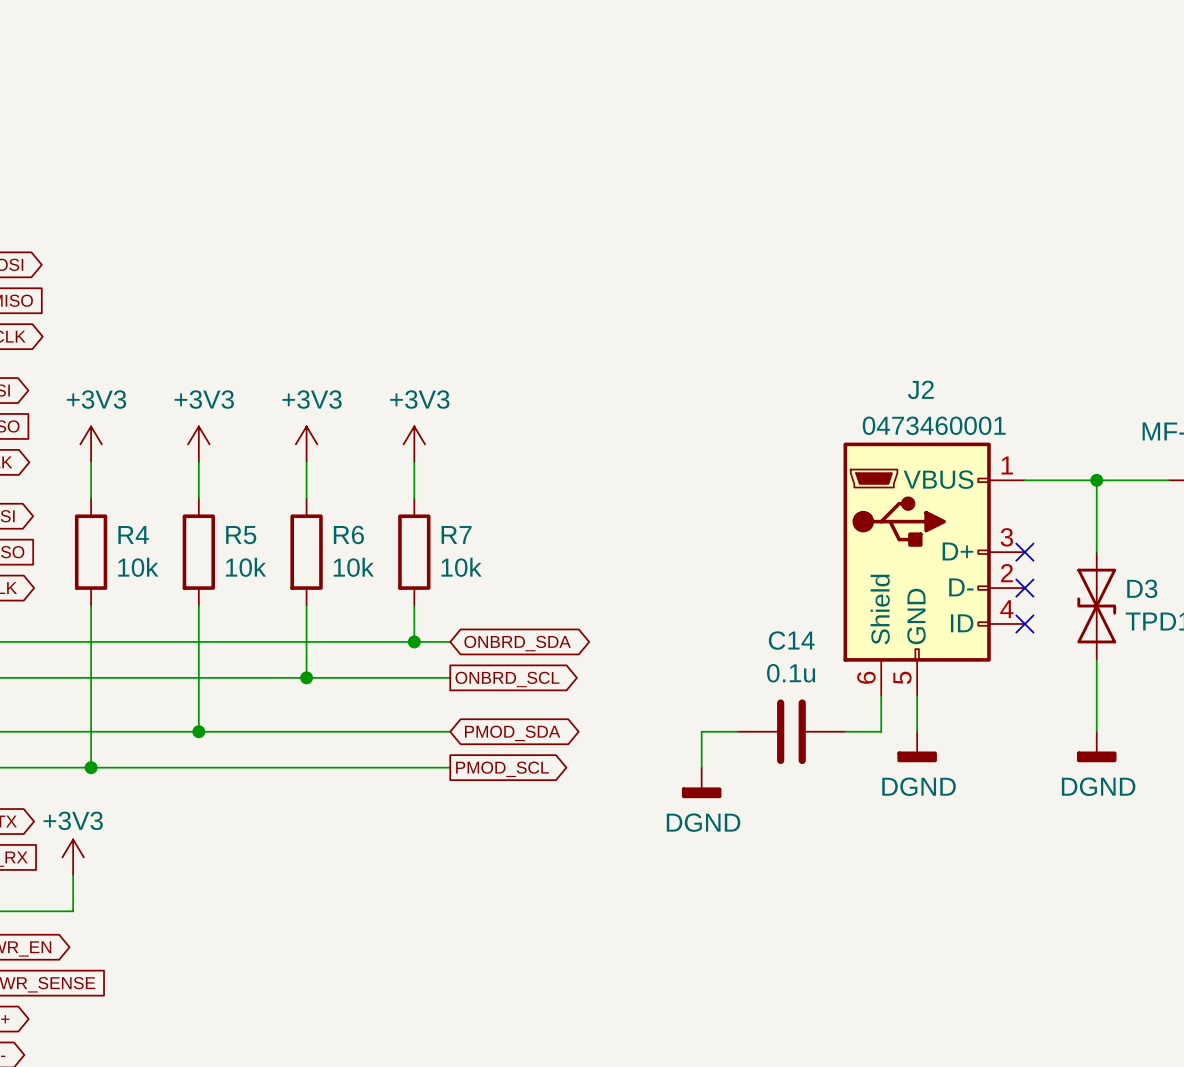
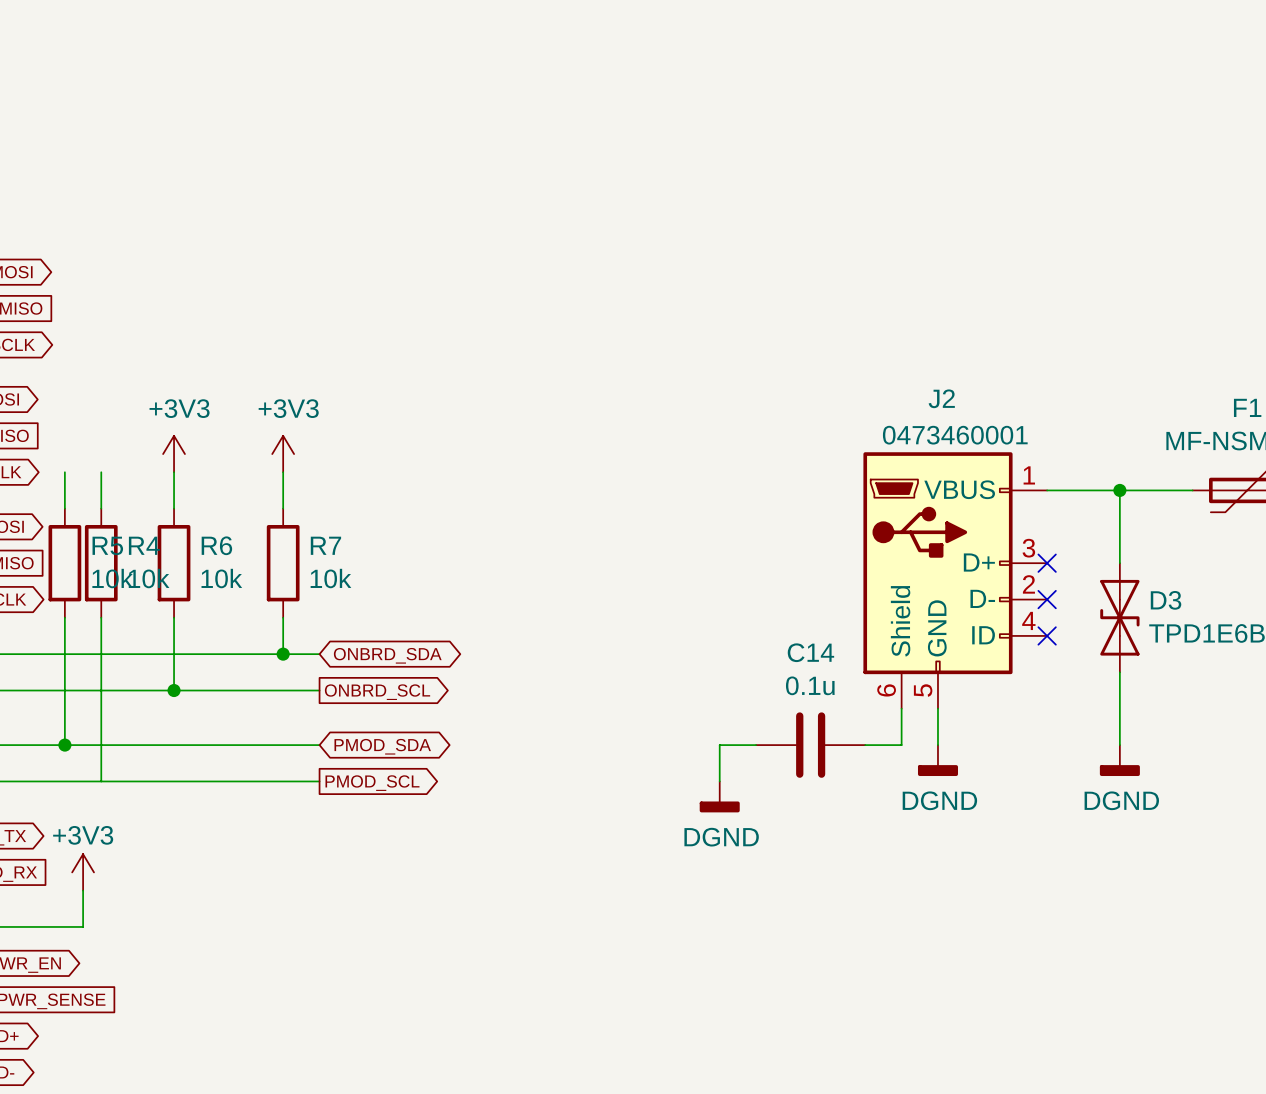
power symbol: +3V3 (91, 444) -> none
power symbol: none -> +3V3 (174, 454)
power symbol: +3V3 (198, 444) -> none
power symbol: none -> +3V3 (283, 454)
power symbol: +3V3 (306, 444) -> none
power symbol: +3V3 (414, 444) -> none
wire: (198, 462) (198, 498) -> (64, 472) (64, 508)
wire: (306, 462) (306, 498) -> (174, 472) (174, 508)
wire: (414, 462) (414, 498) -> (283, 472) (283, 508)
R5 position: (198, 552) -> (64, 563)
R6 position: (306, 552) -> (174, 563)
R7 position: (414, 552) -> (283, 563)
wire: none -> (174, 617) (174, 690)
wire: (198, 606) (198, 731) -> (64, 617) (64, 745)
wire: (306, 606) (306, 677) (450, 677) -> none
wire: (414, 606) (414, 641) -> (283, 617) (283, 654)
wire: (306, 641) (450, 641) -> none
junction: (414, 641) -> none
global label position: ONBRD_SDA (517, 643) -> ONBRD_SDA (387, 655)
junction: none -> (174, 690)
junction position: (306, 677) -> (283, 654)
global label position: ONBRD_SCL (507, 679) -> ONBRD_SCL (377, 692)
junction: (198, 731) -> none
wire: (306, 731) (450, 731) -> none
global label position: PMOD_SDA (512, 733) -> PMOD_SDA (382, 746)
junction position: (91, 767) -> (64, 745)
wire: (306, 767) (450, 767) -> none
global label position: PMOD_SCL (502, 769) -> PMOD_SCL (372, 783)

